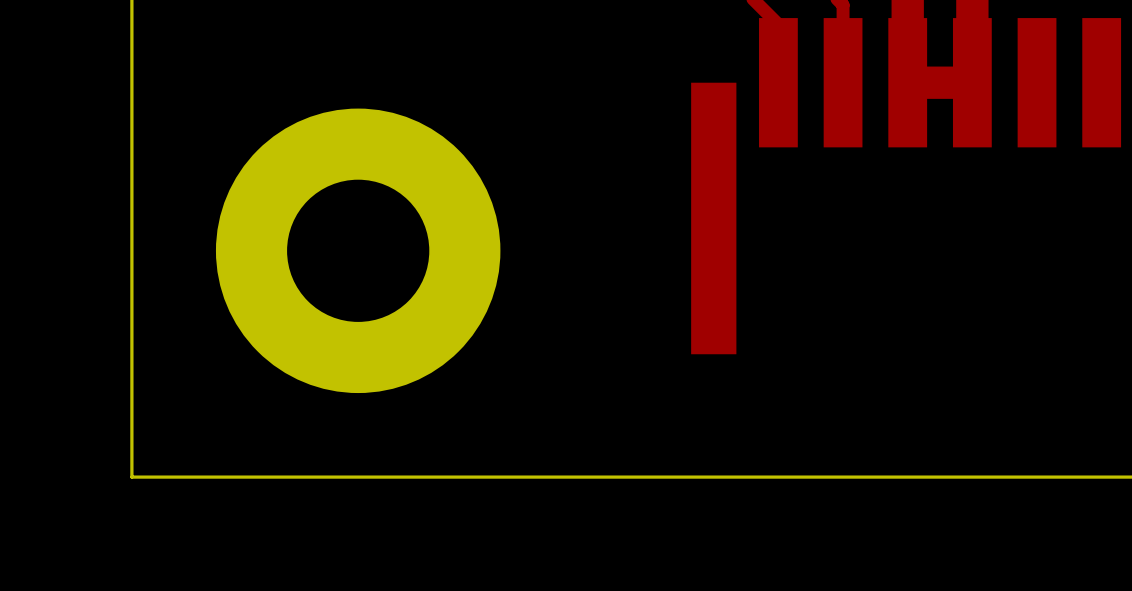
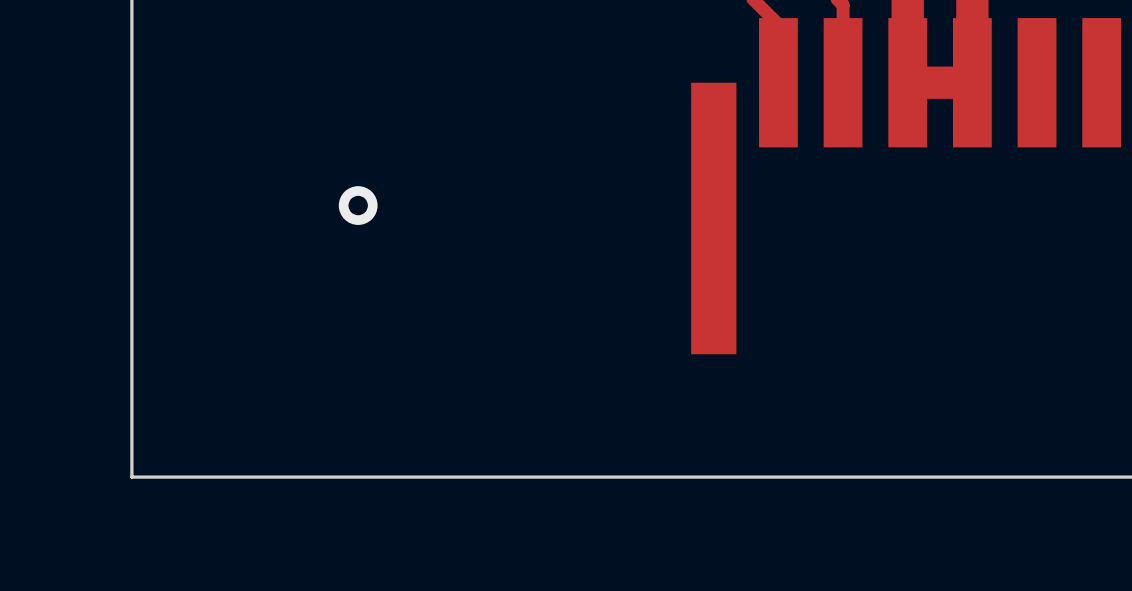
via: none -> (358, 205)
part: (358, 250) -> none

